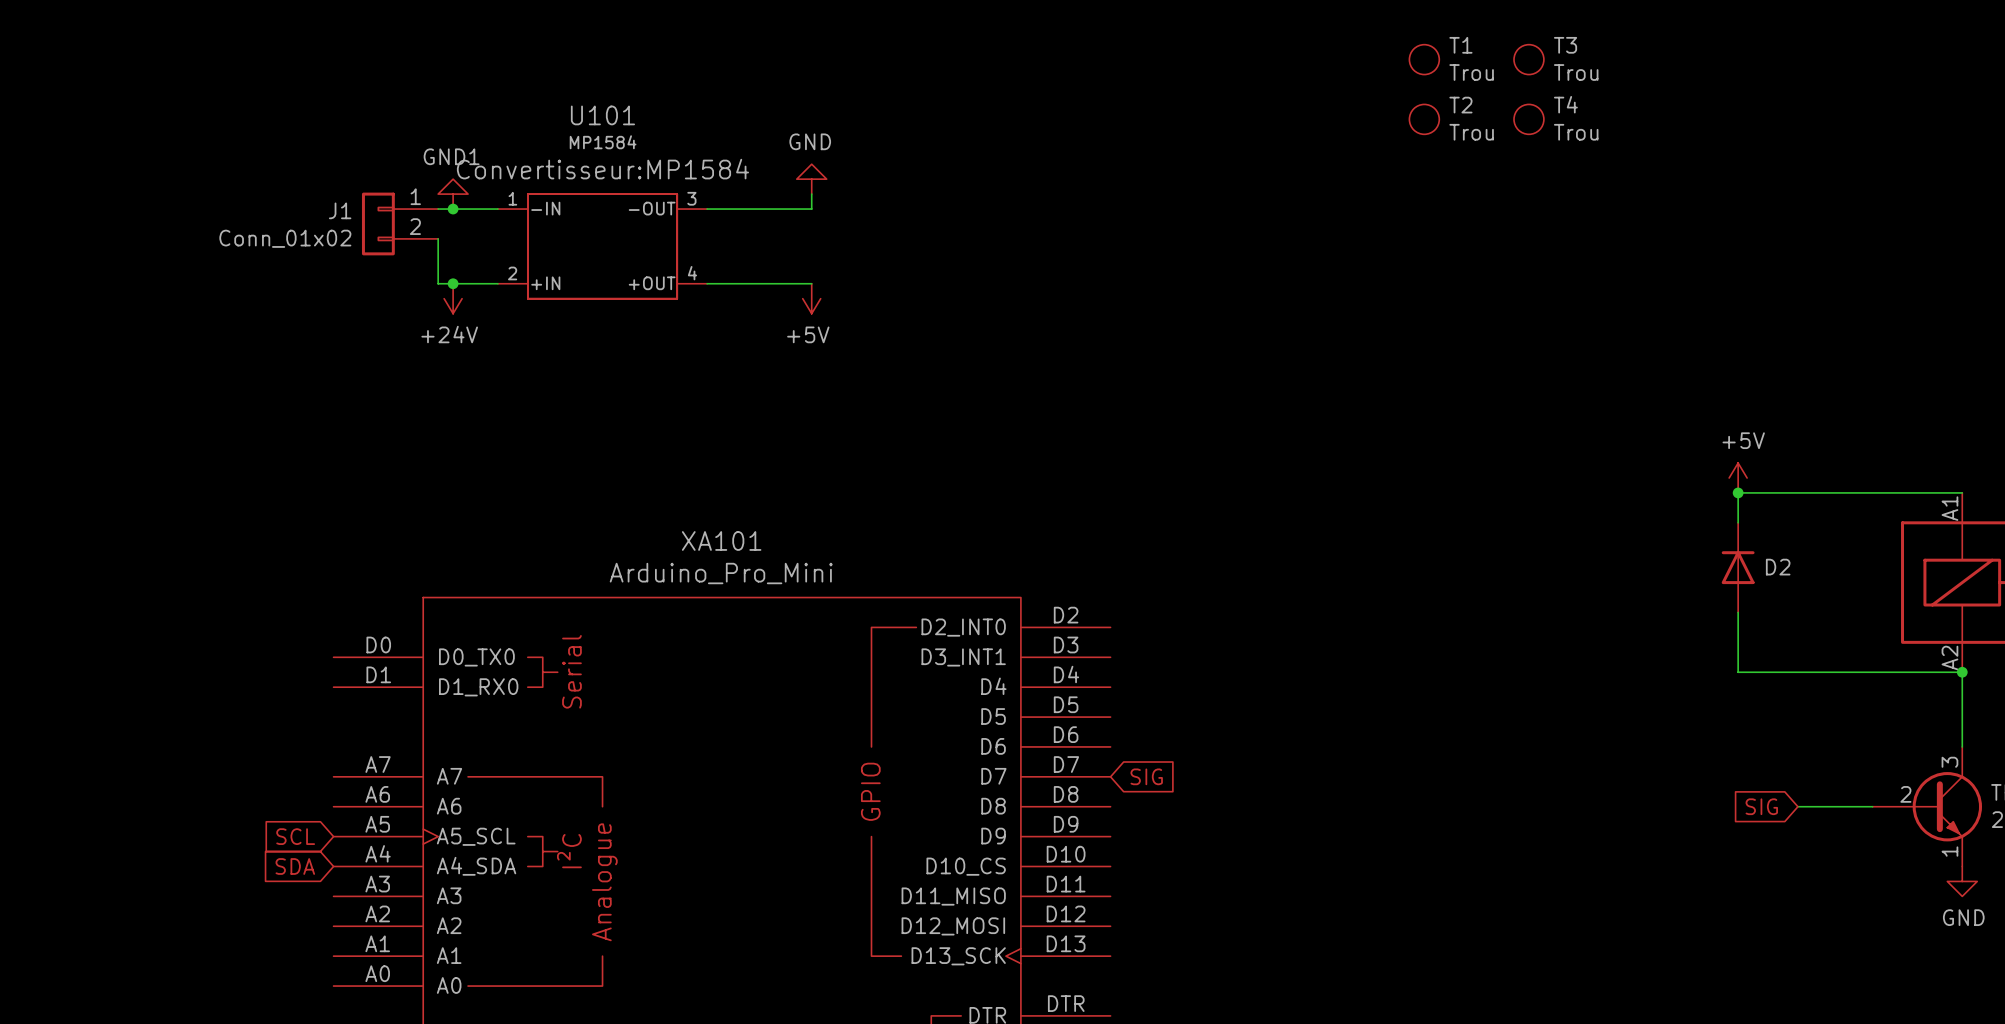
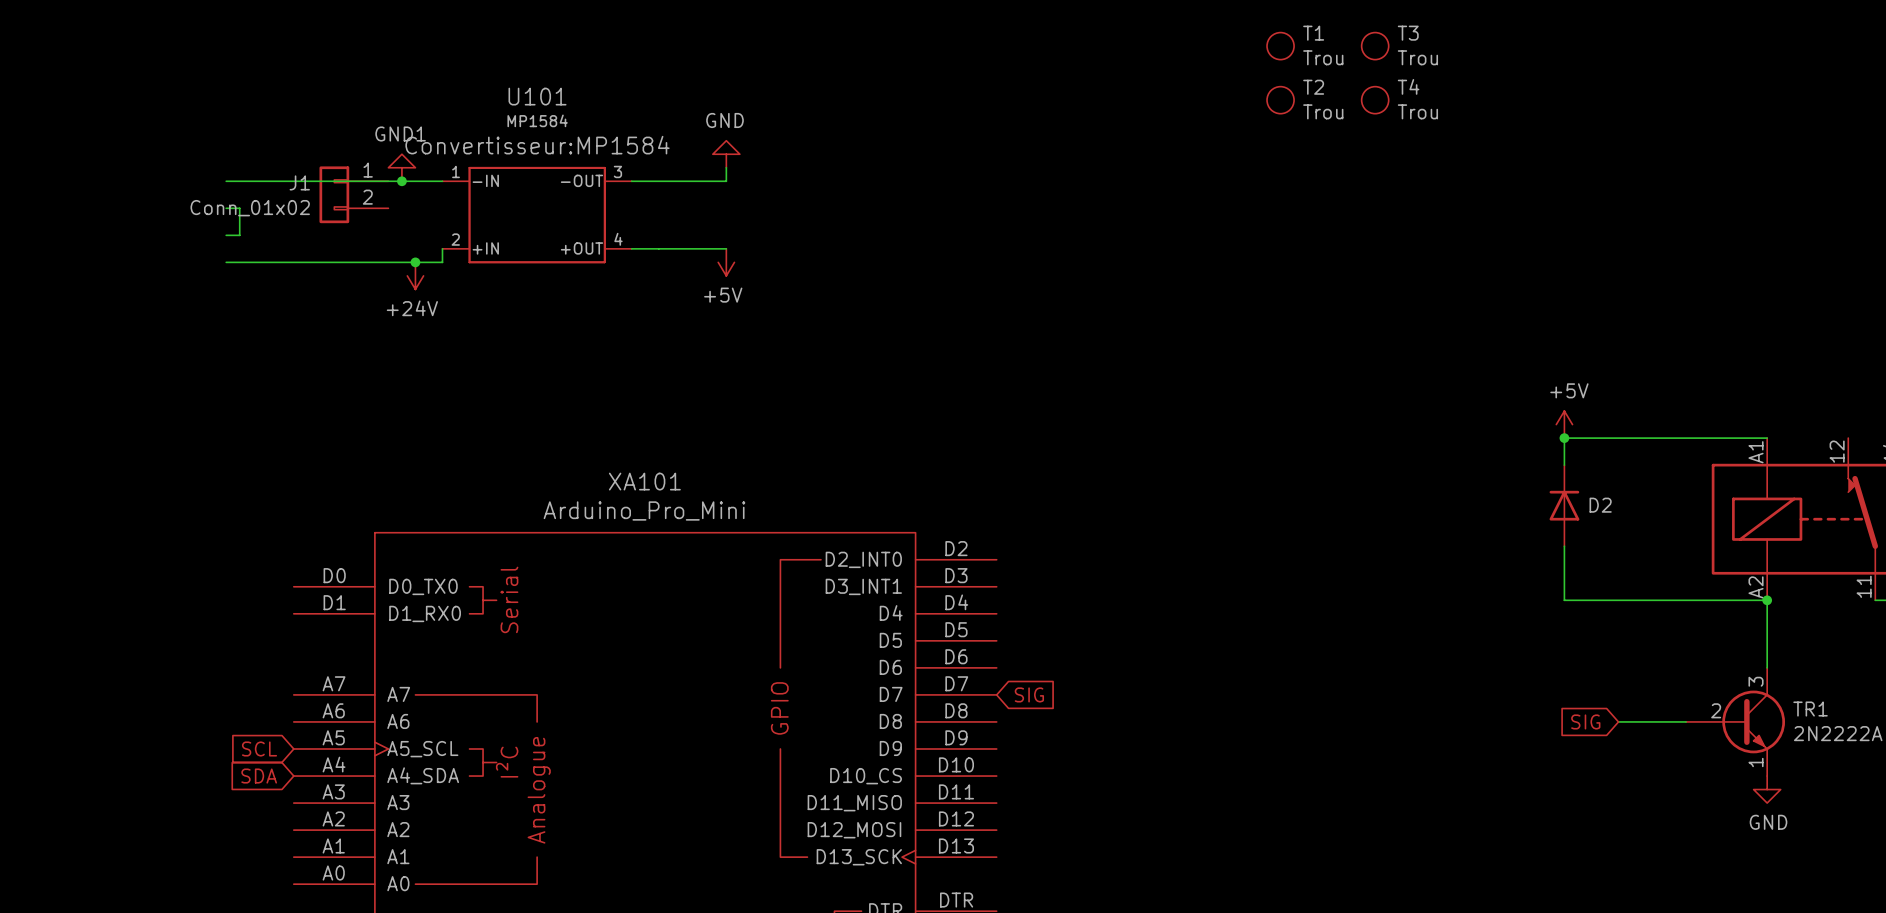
wire: none -> (226, 181) (388, 181)
wire: none -> (226, 208) (239, 208) (239, 235) (226, 235)
wire: (438, 238) (438, 283) (497, 283) -> (226, 262) (442, 262) (442, 248)
junction position: (453, 283) -> (415, 262)
power symbol position: +24V (453, 298) -> +24V (415, 275)

